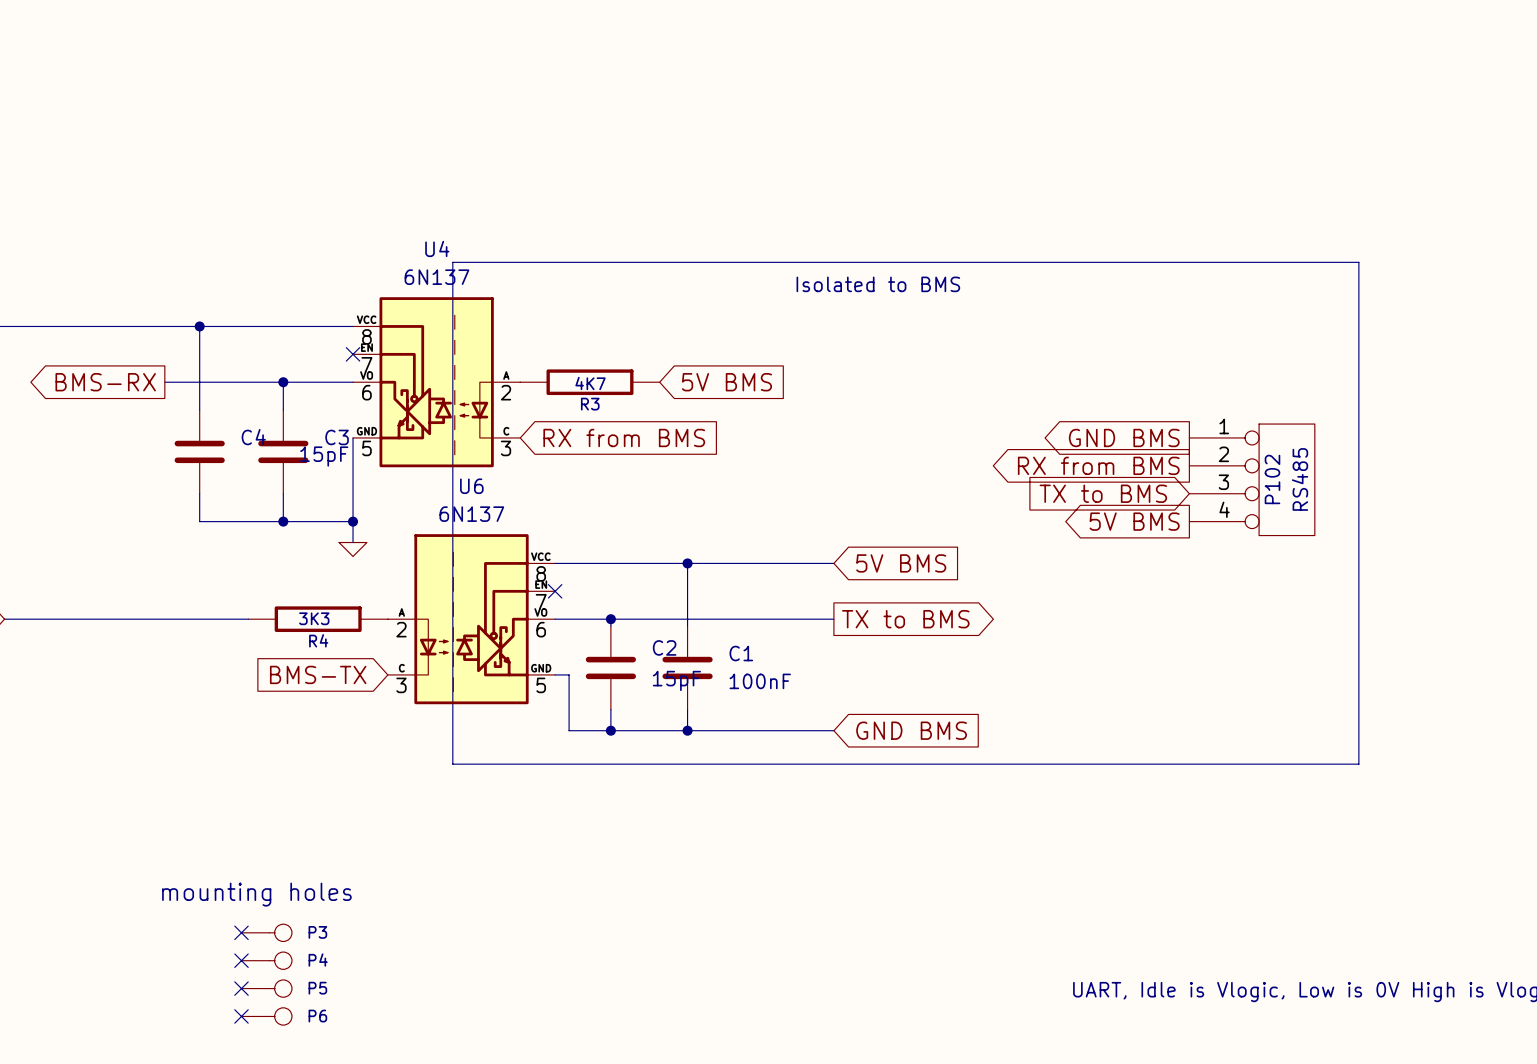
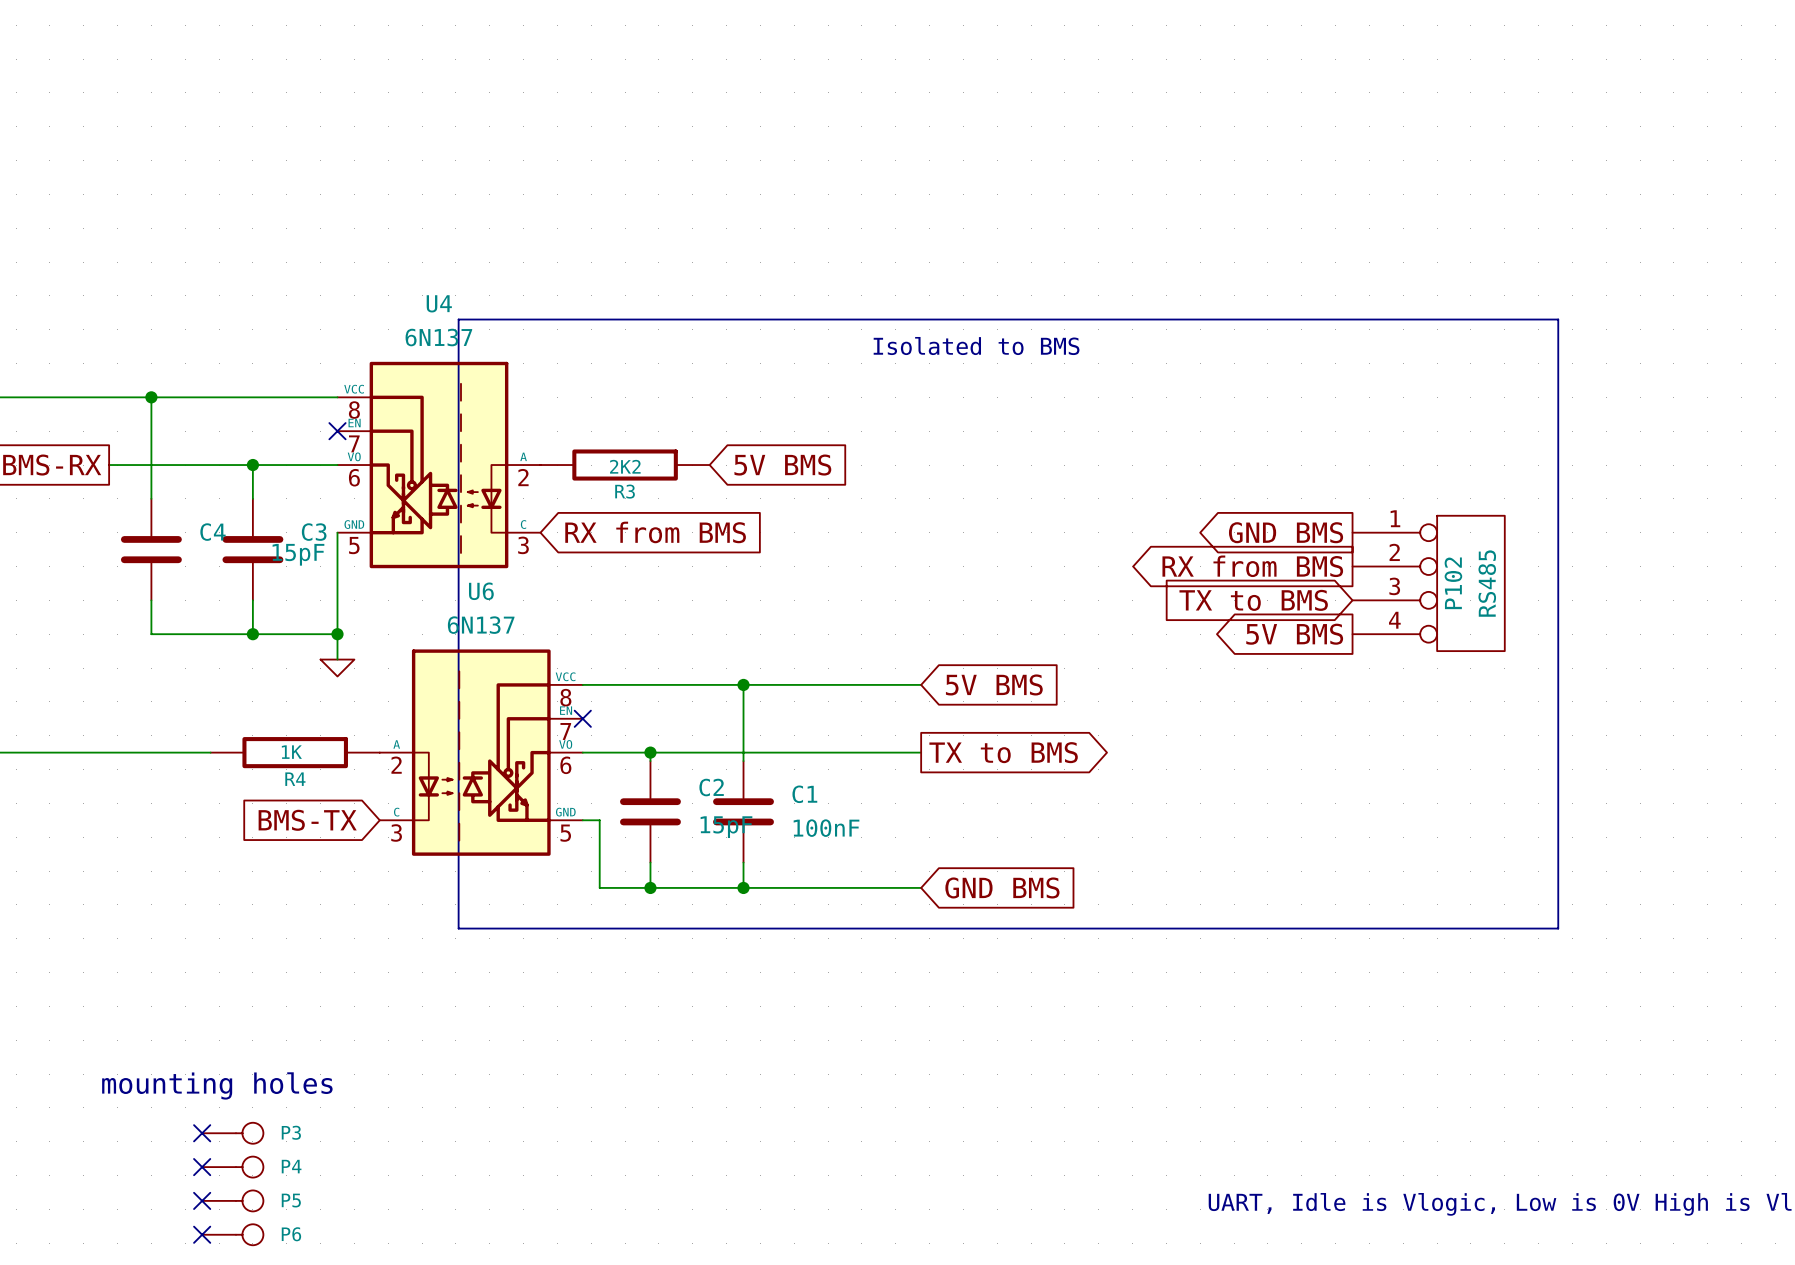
R3 value: 4K7 (590, 383) -> 2K2 (625, 466)
R4 value: 3K3 (314, 618) -> 1K (291, 752)

